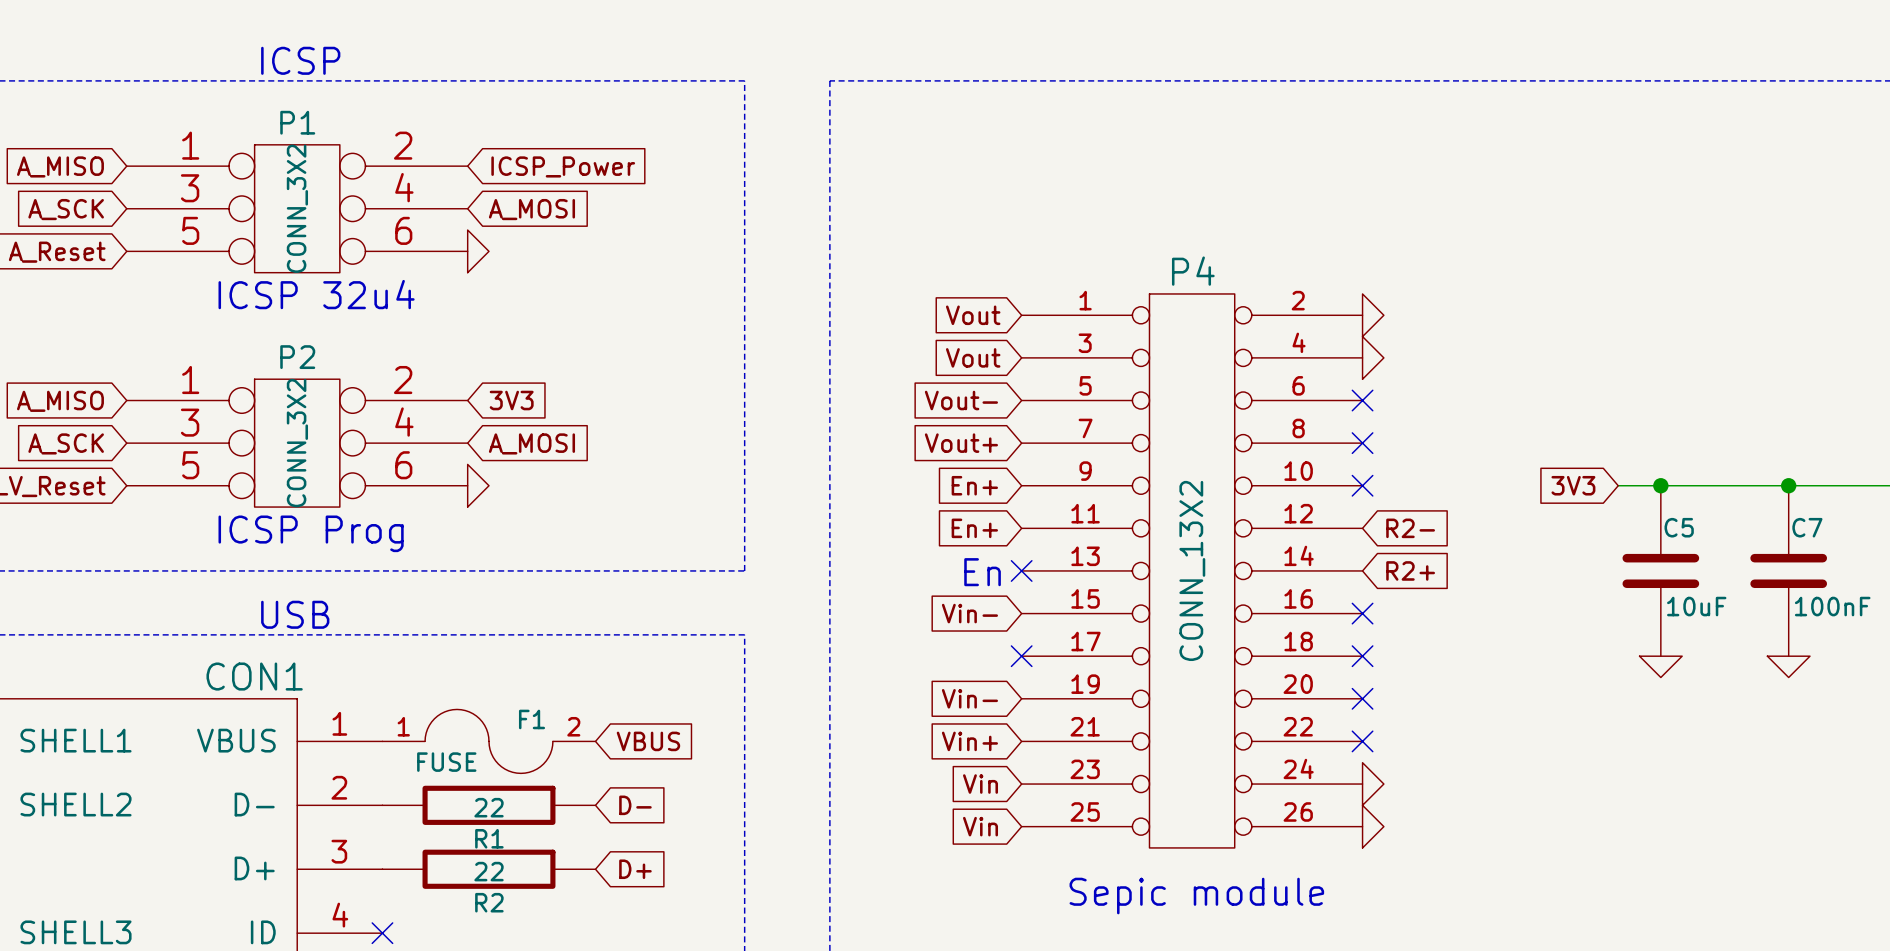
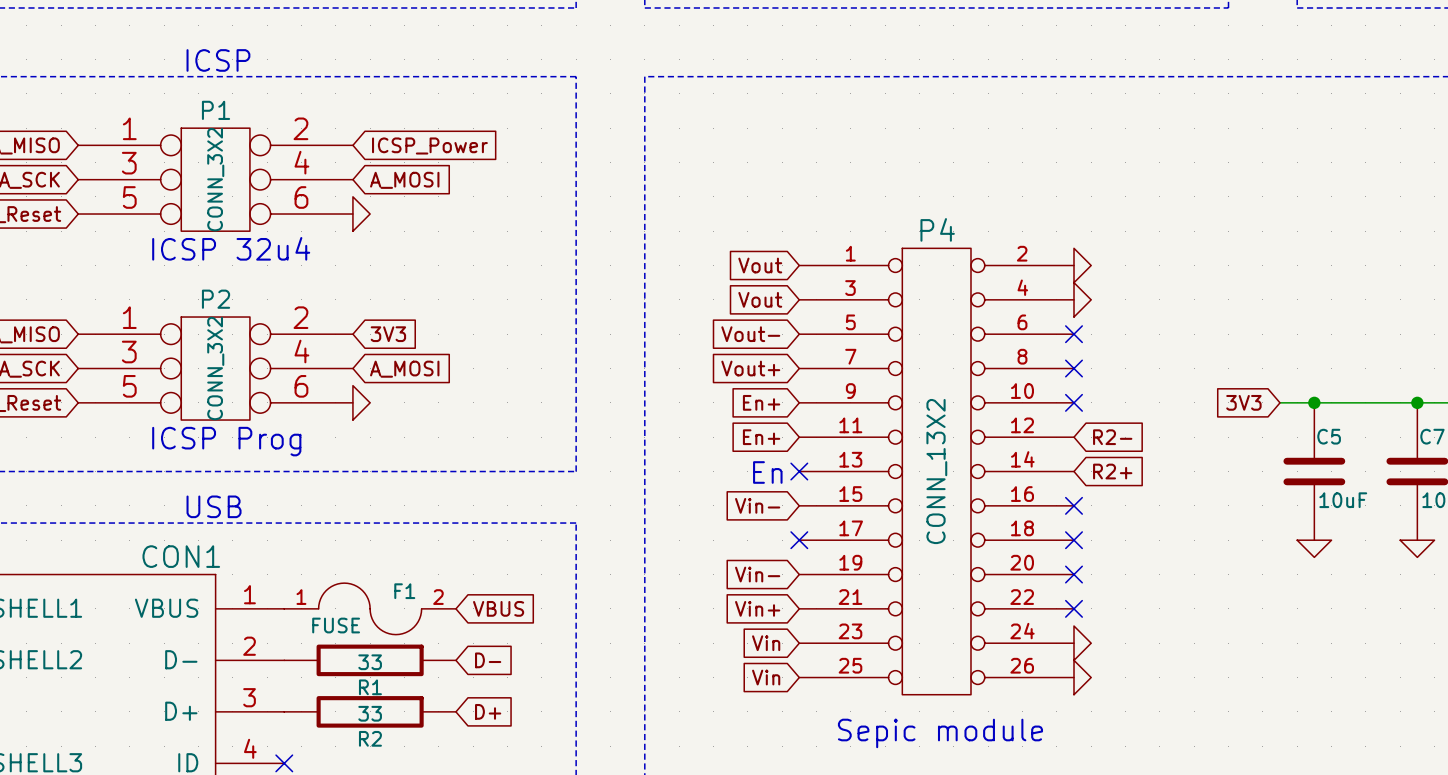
R1 value: 22 (489, 807) -> 33 (370, 662)
R2 value: 22 (489, 871) -> 33 (370, 713)

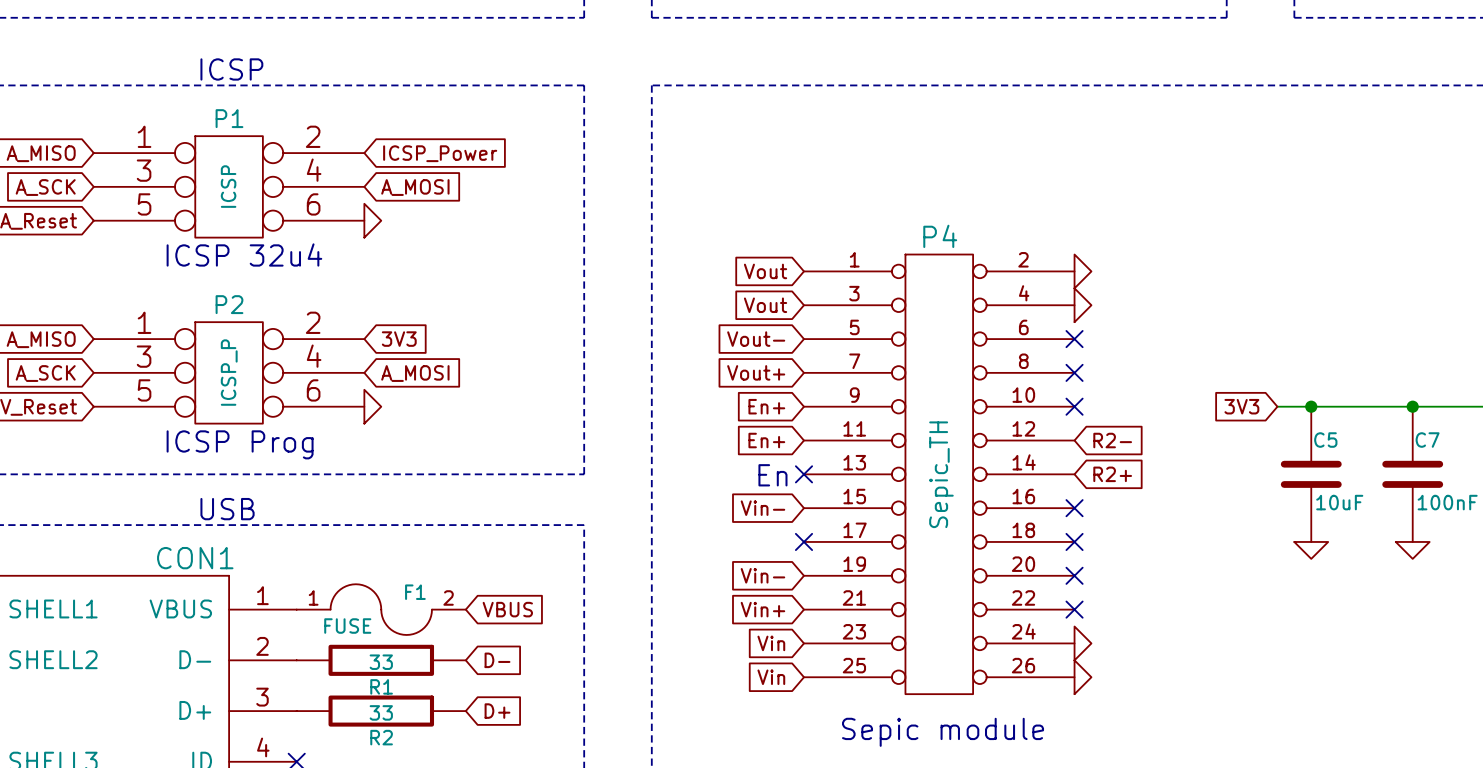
P1 value: CONN_3X2 (215, 179) -> ICSP (228, 186)
P2 value: CONN_3X2 (215, 368) -> ICSP_P (229, 372)
P4 value: CONN_13X2 (936, 471) -> Sepic_TH (941, 474)

